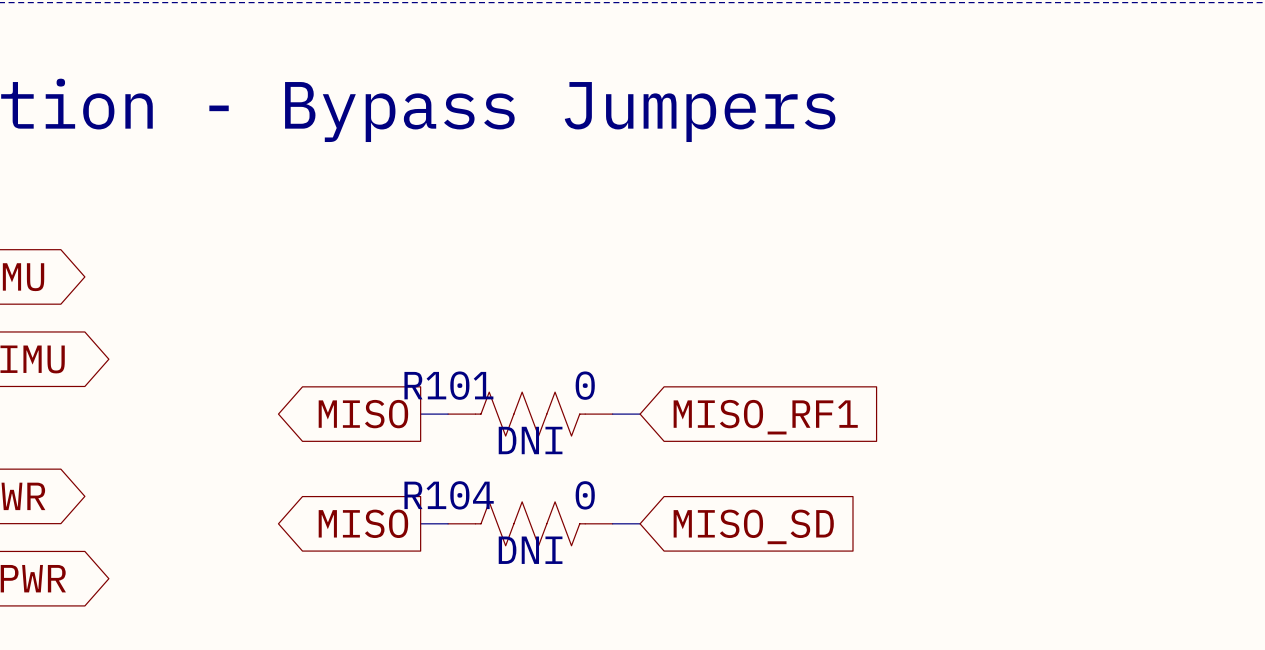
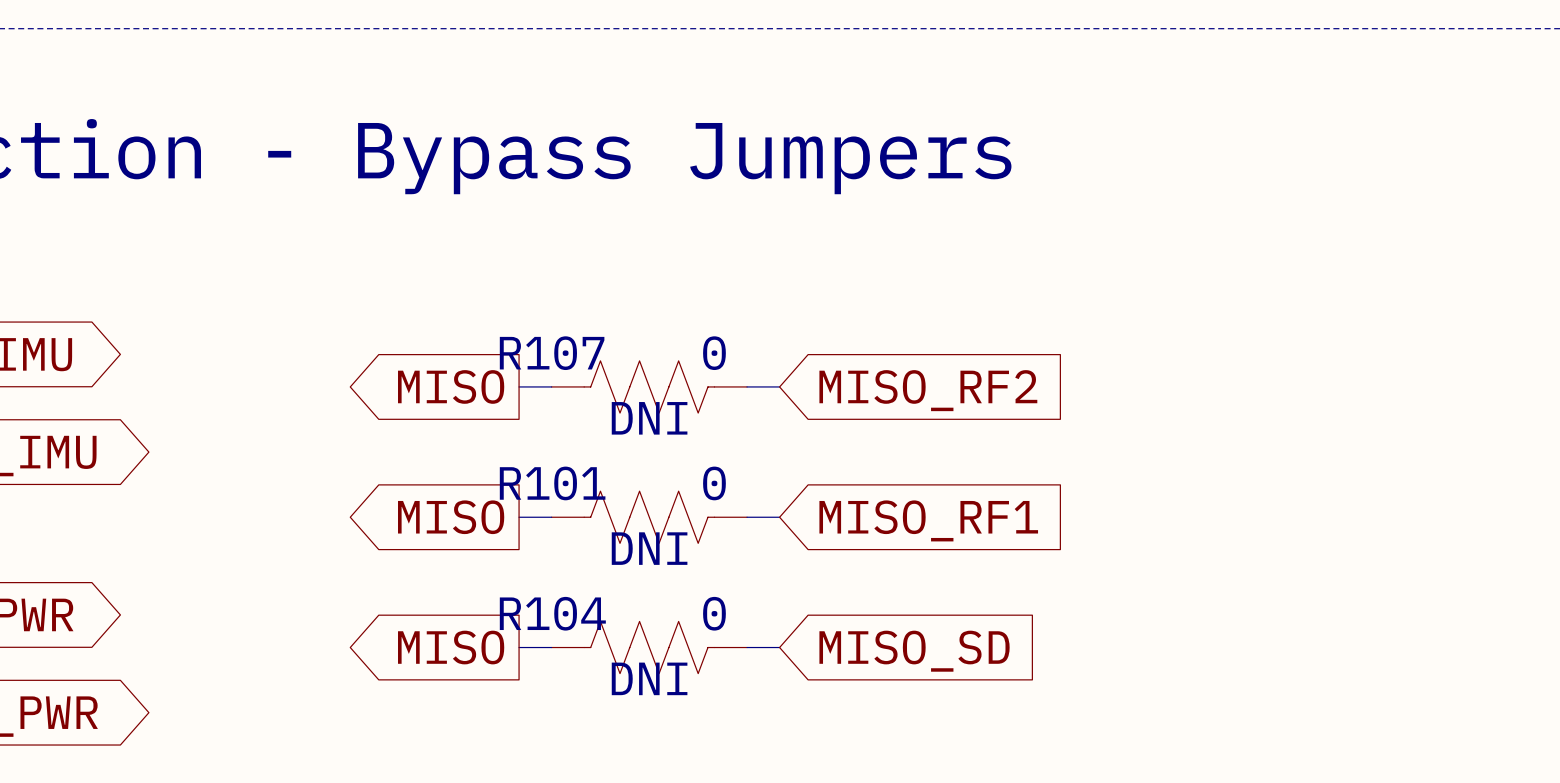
global label: none -> MISO (451, 386)
wire: none -> (519, 386) (551, 386)
R107: none -> 0 (649, 386)
wire: none -> (747, 386) (779, 386)
global label: none -> MISO_RF2 (928, 390)

